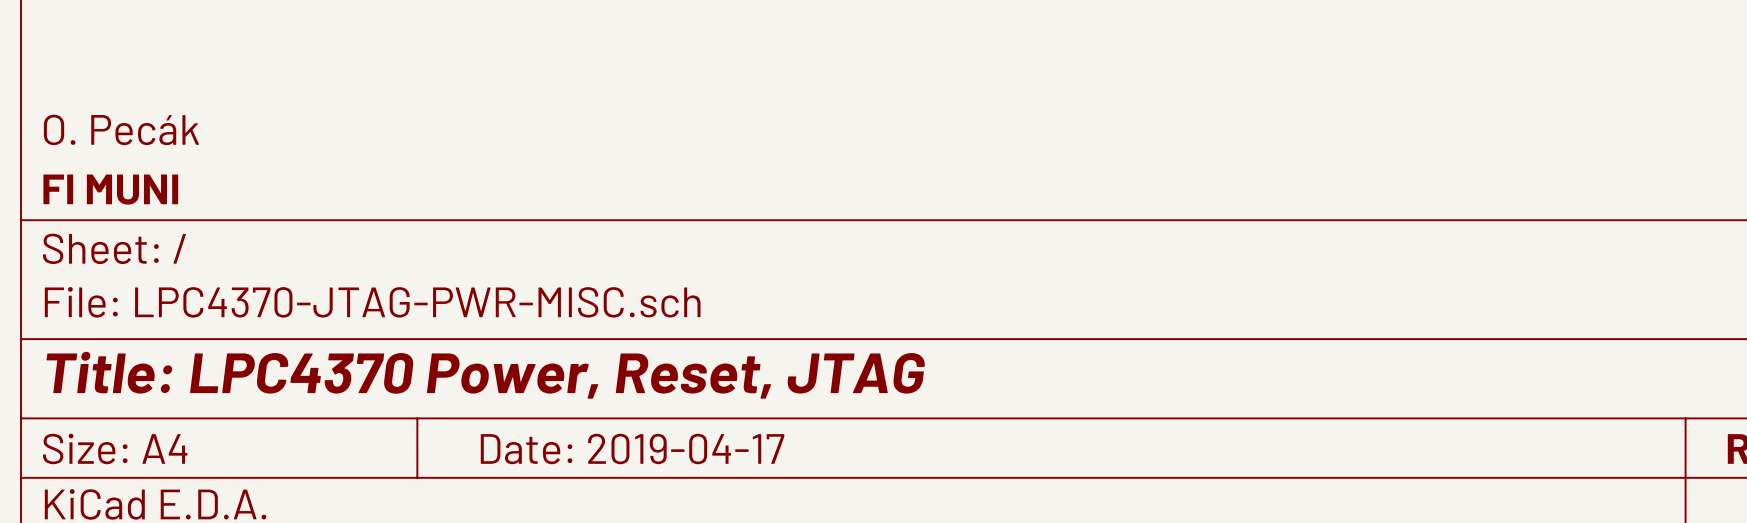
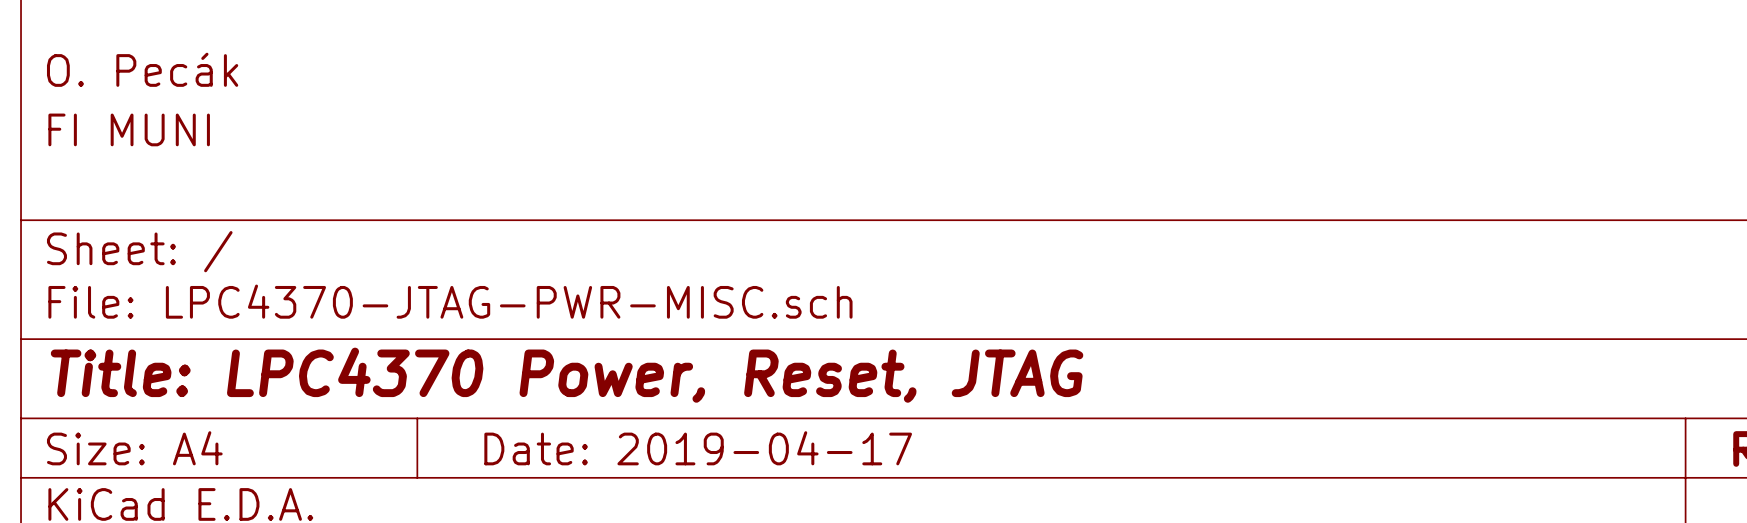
title block: none -> O. Pecák (142, 69)
title block: O. Pecák (121, 129) -> FI MUNI (129, 129)
title block: FI MUNI (110, 189) -> none

